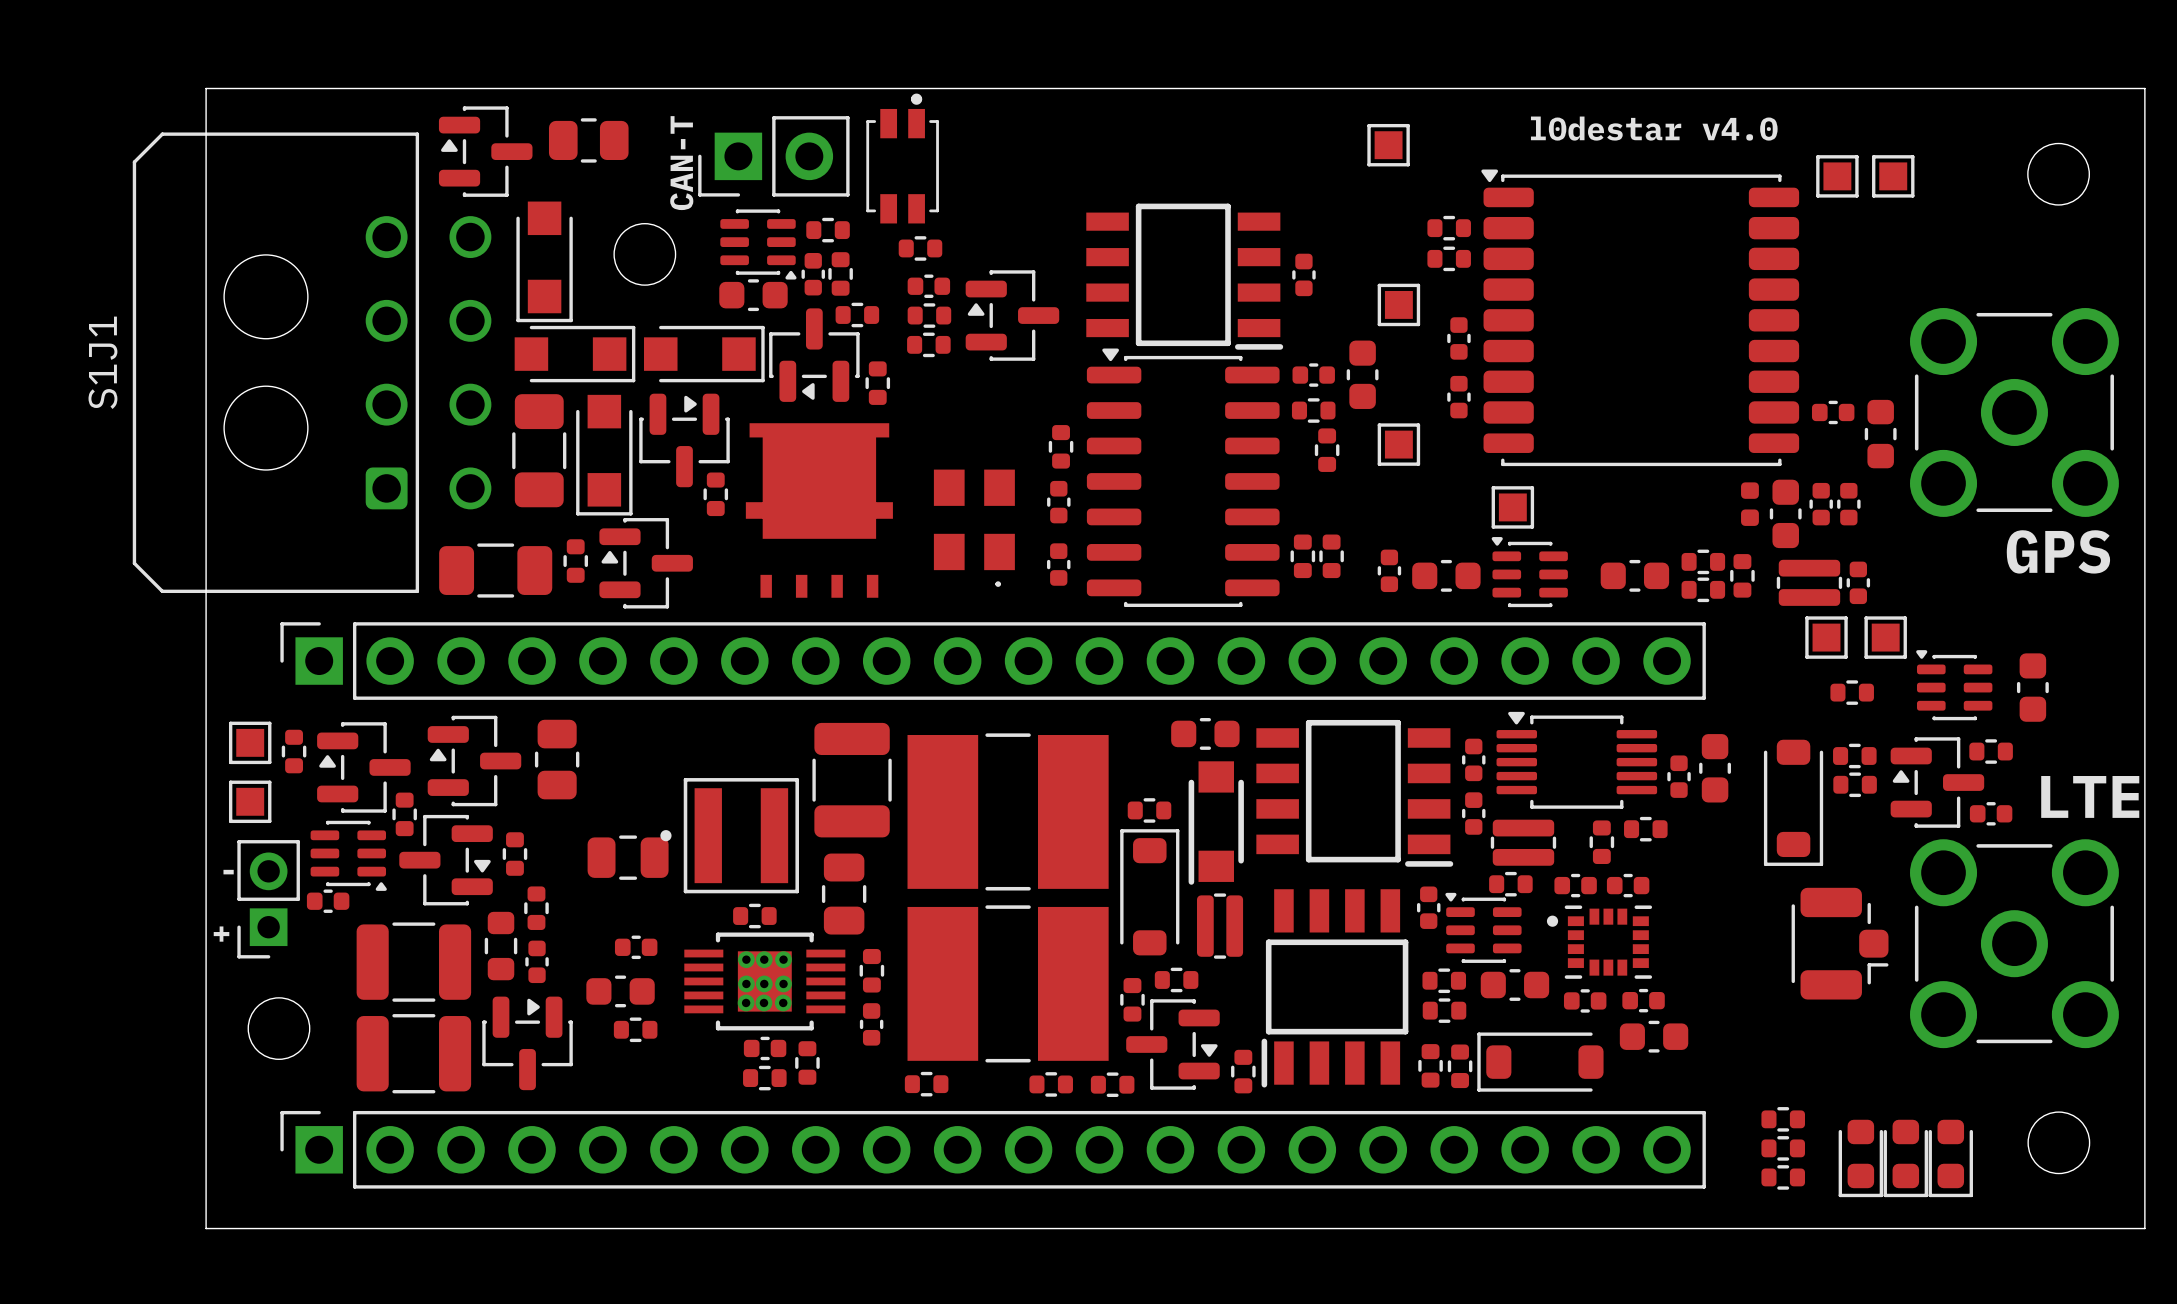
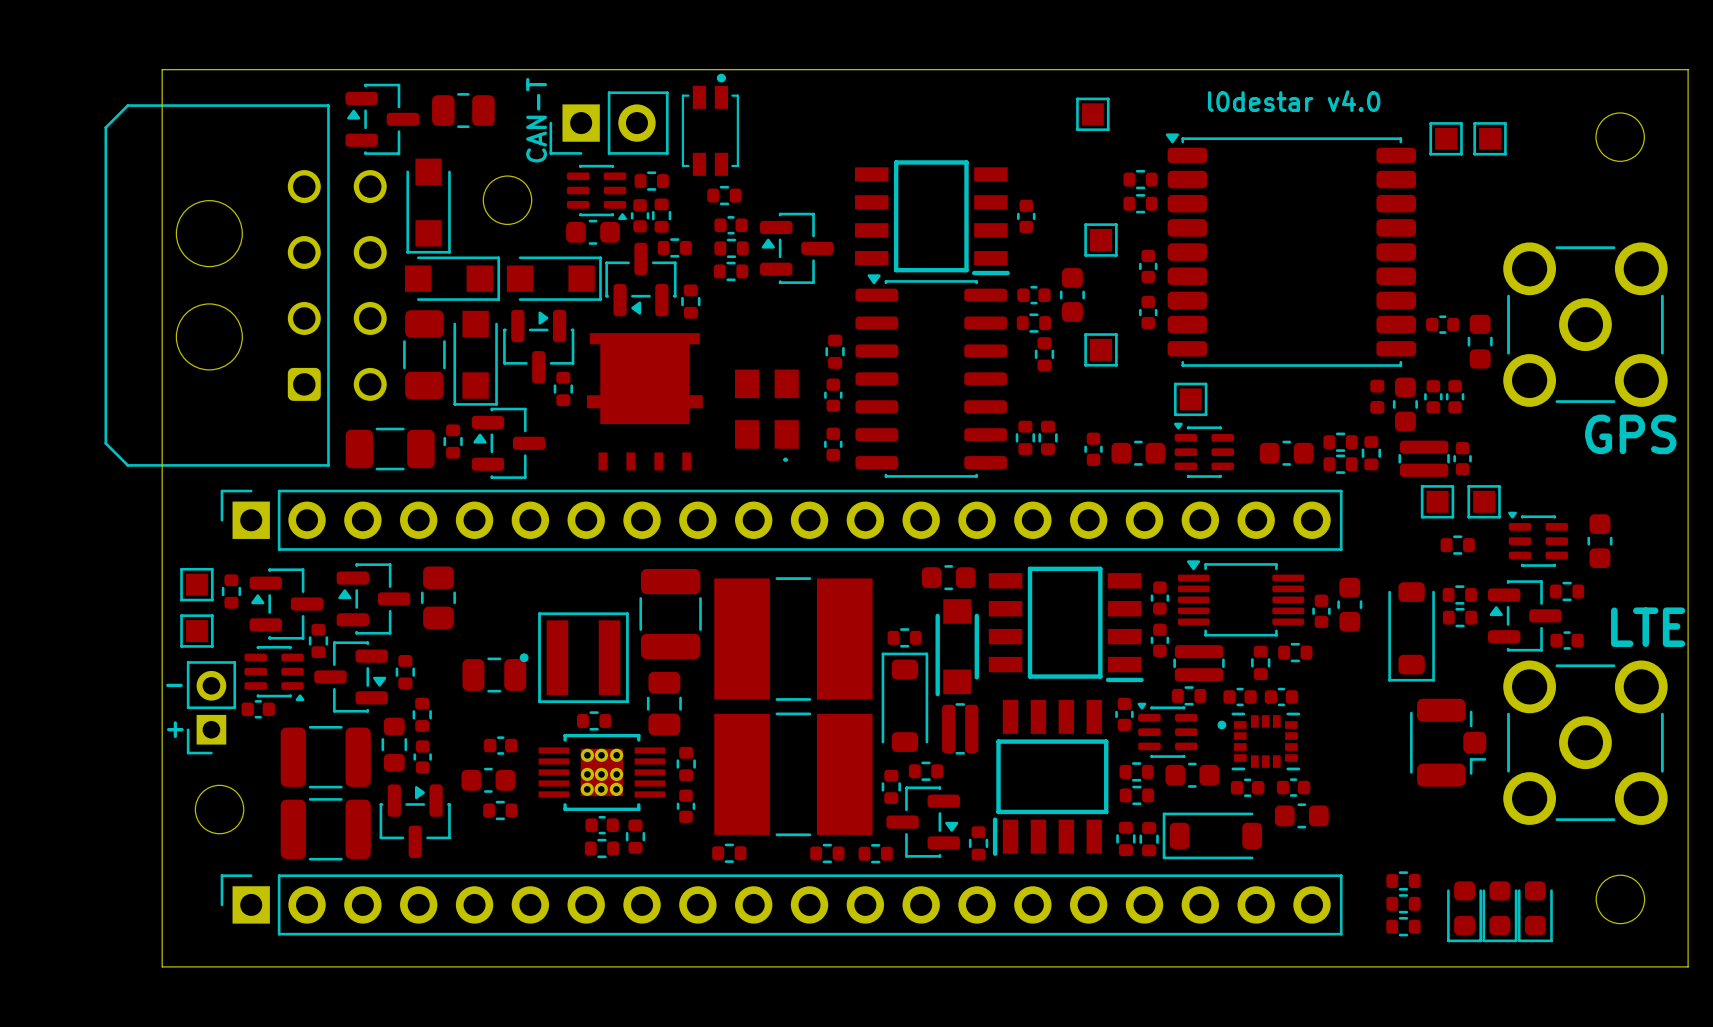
S1J1 name: S1J1 (102, 362) -> none

